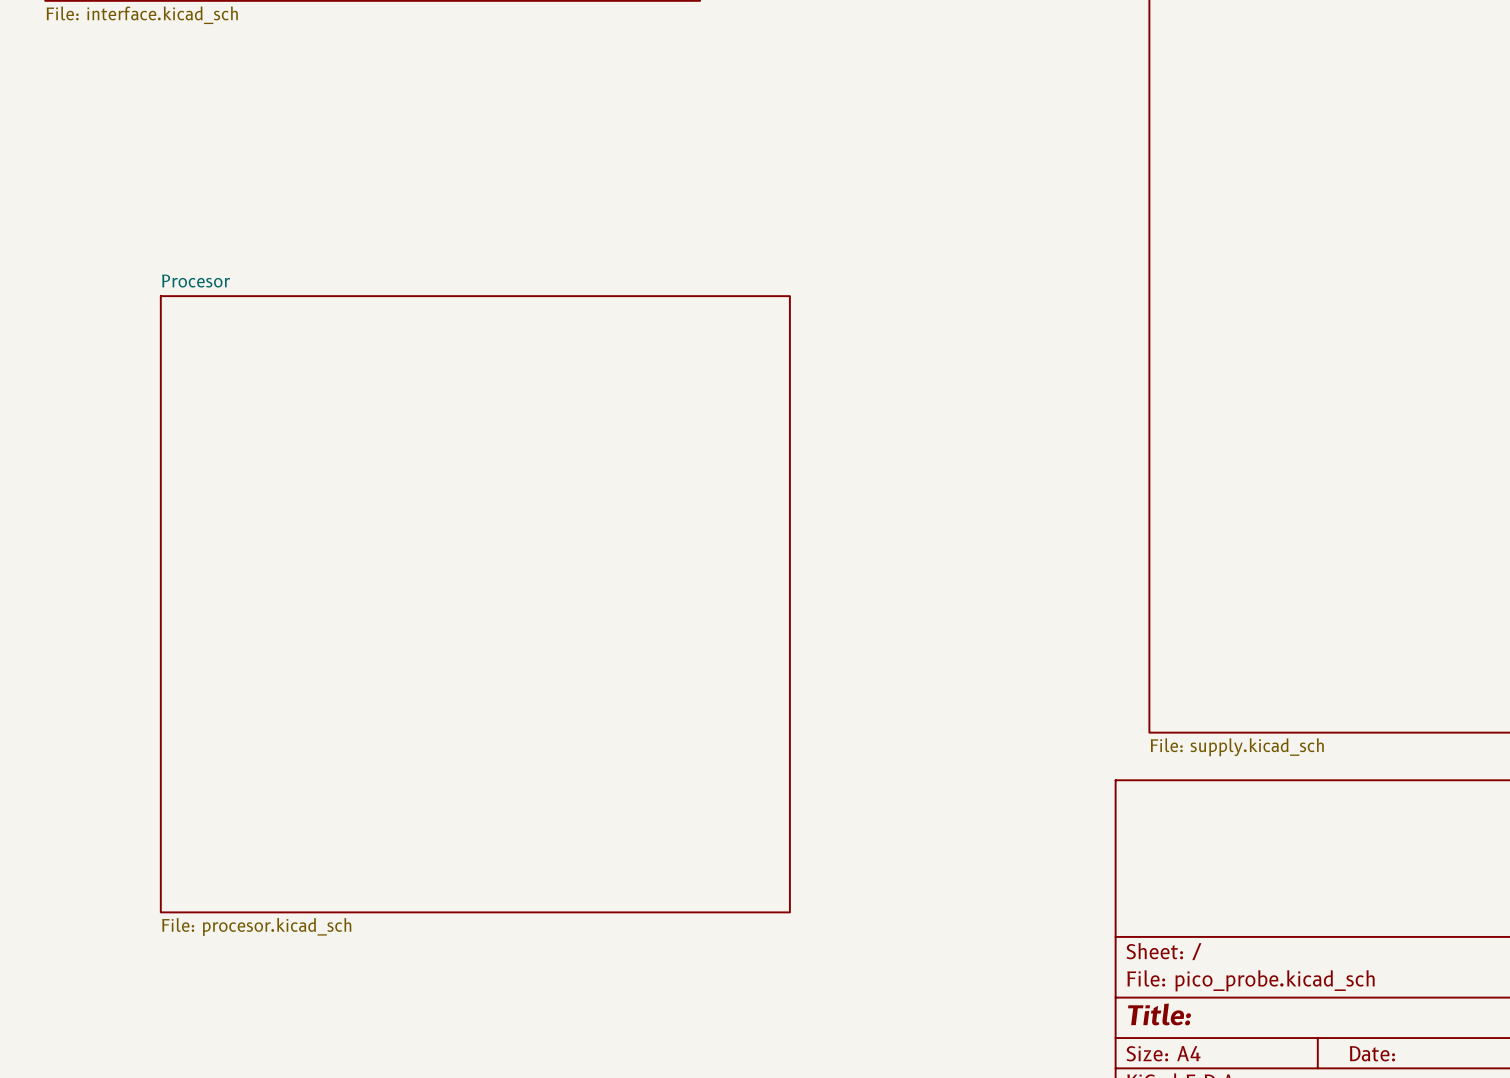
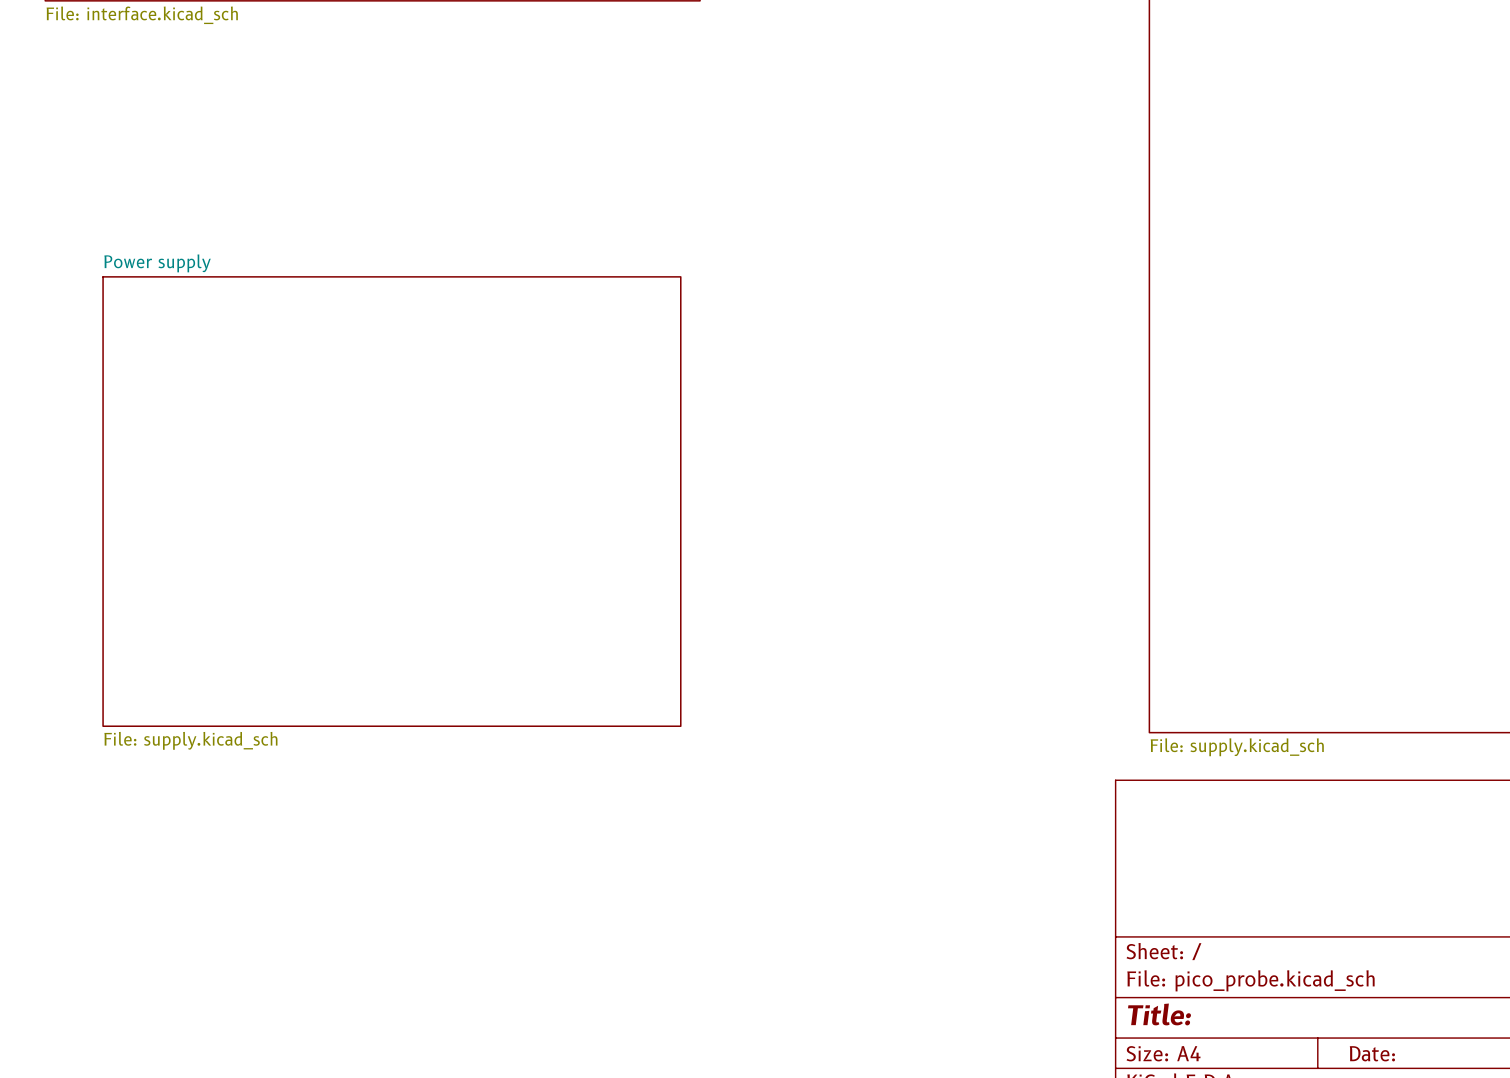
sheet Power supply: none -> File: supply.kicad_sch (391, 501)
sheet Procesor: File: procesor.kicad_sch (475, 604) -> none

